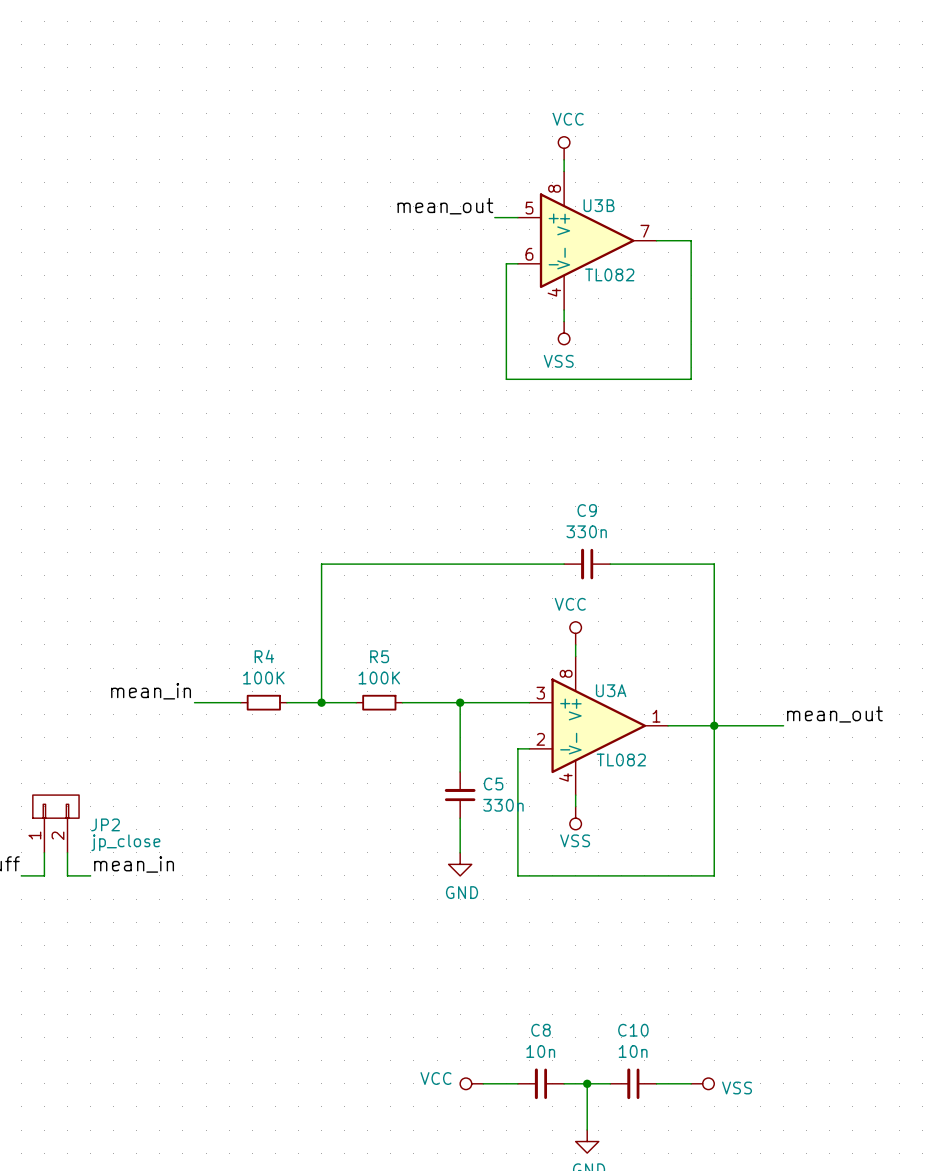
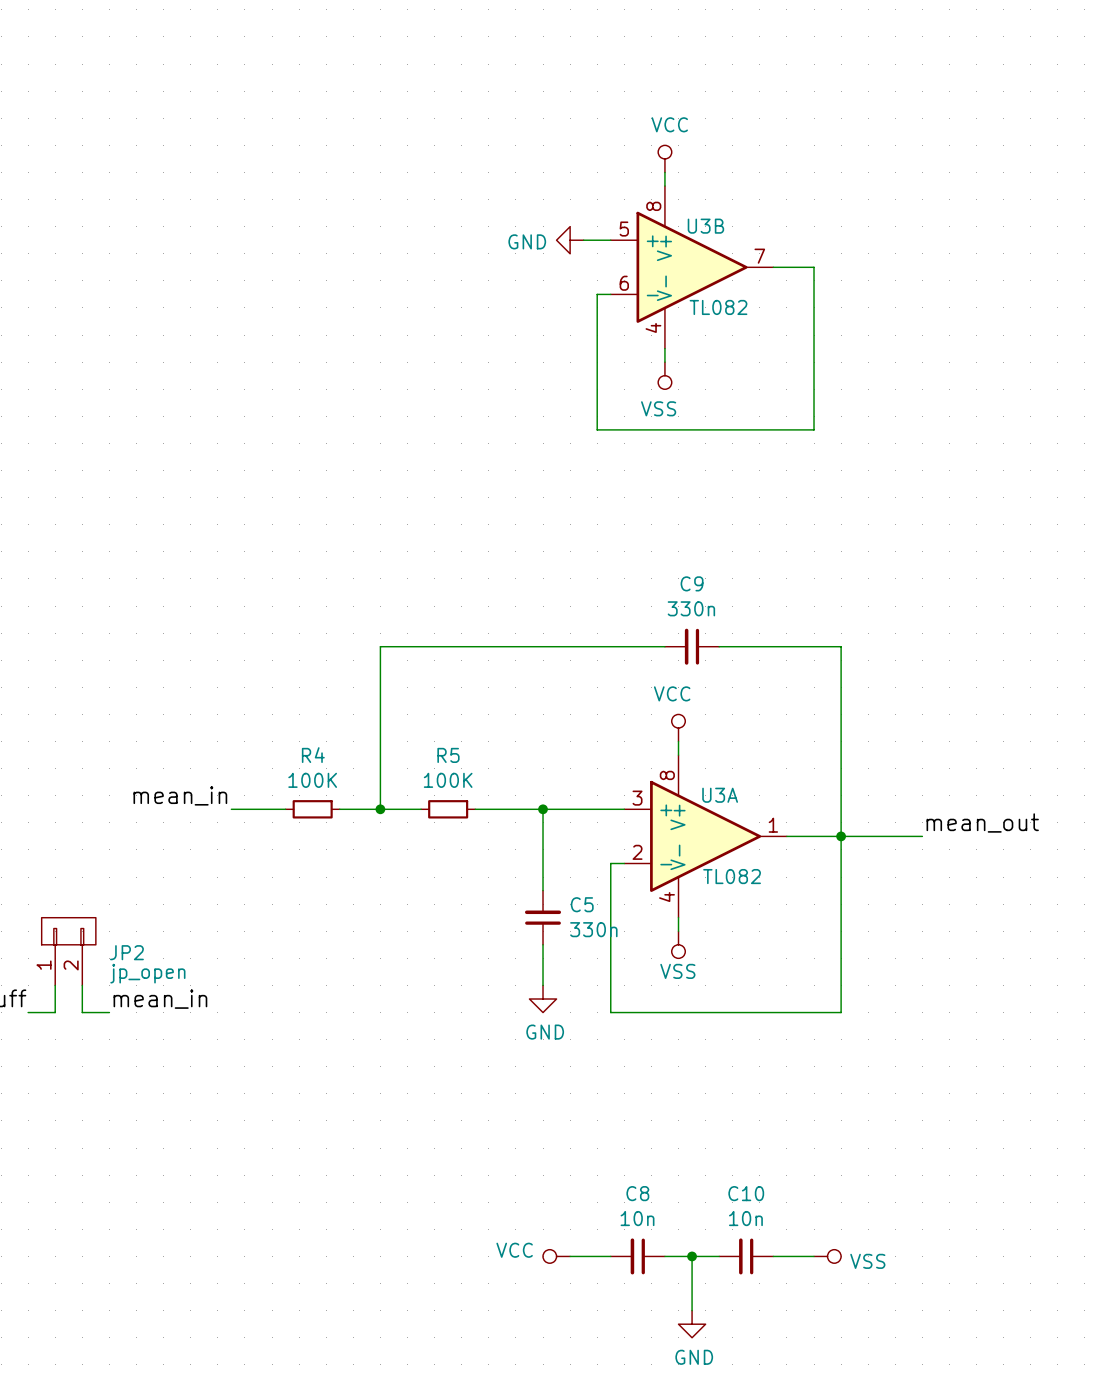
label: mean_out (445, 206) -> none
power symbol: none -> GND (570, 240)
JP2 value: jp_close (125, 842) -> jp_open (147, 973)

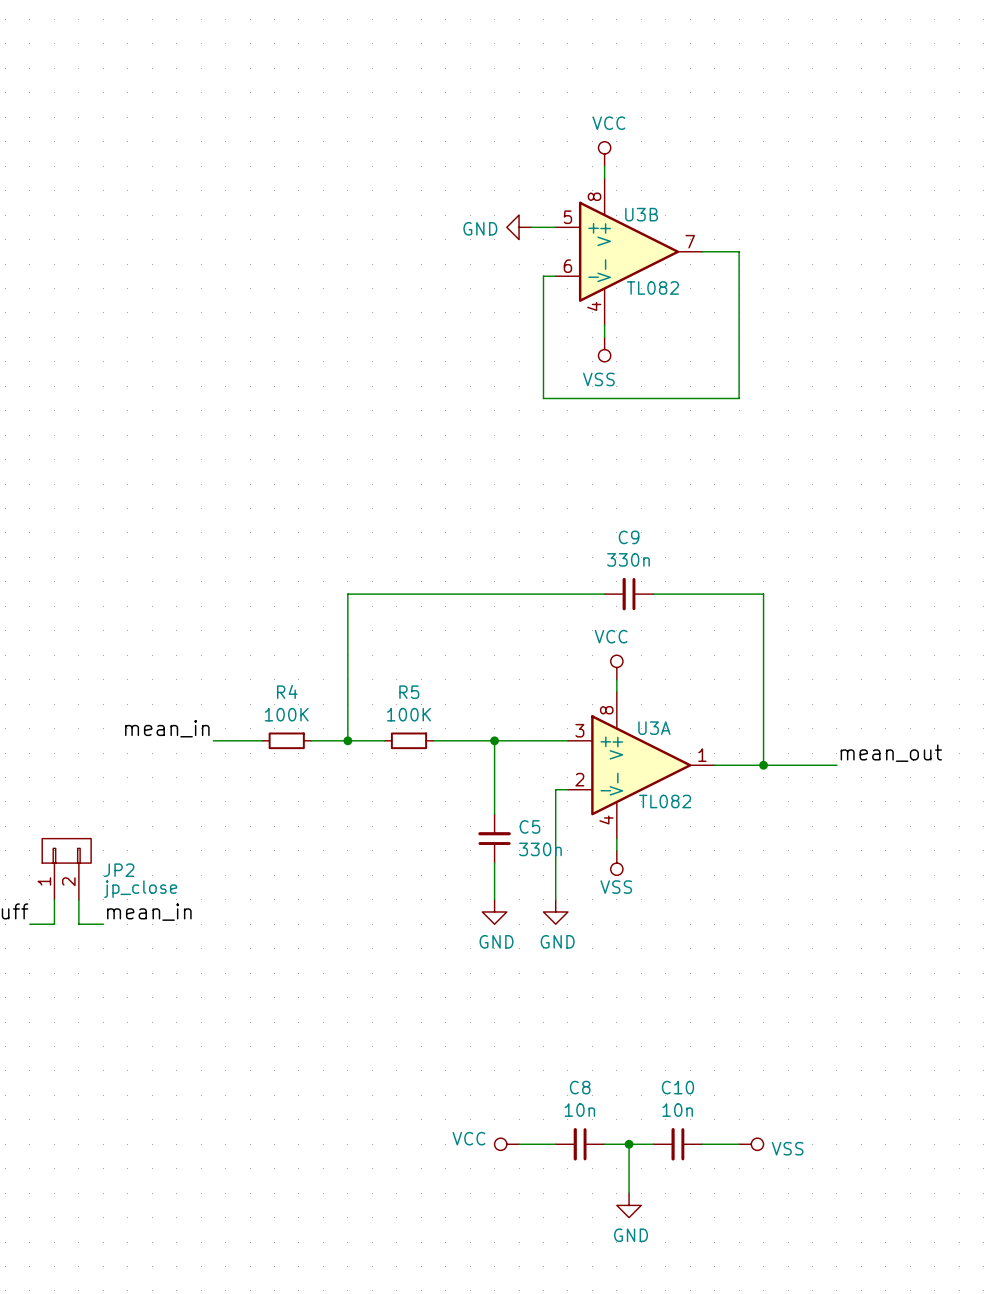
wire: (841, 836) (841, 1012) (610, 1012) (610, 985) -> none
JP2 value: jp_open (147, 973) -> jp_close (140, 889)
power symbol: none -> GND (555, 911)

